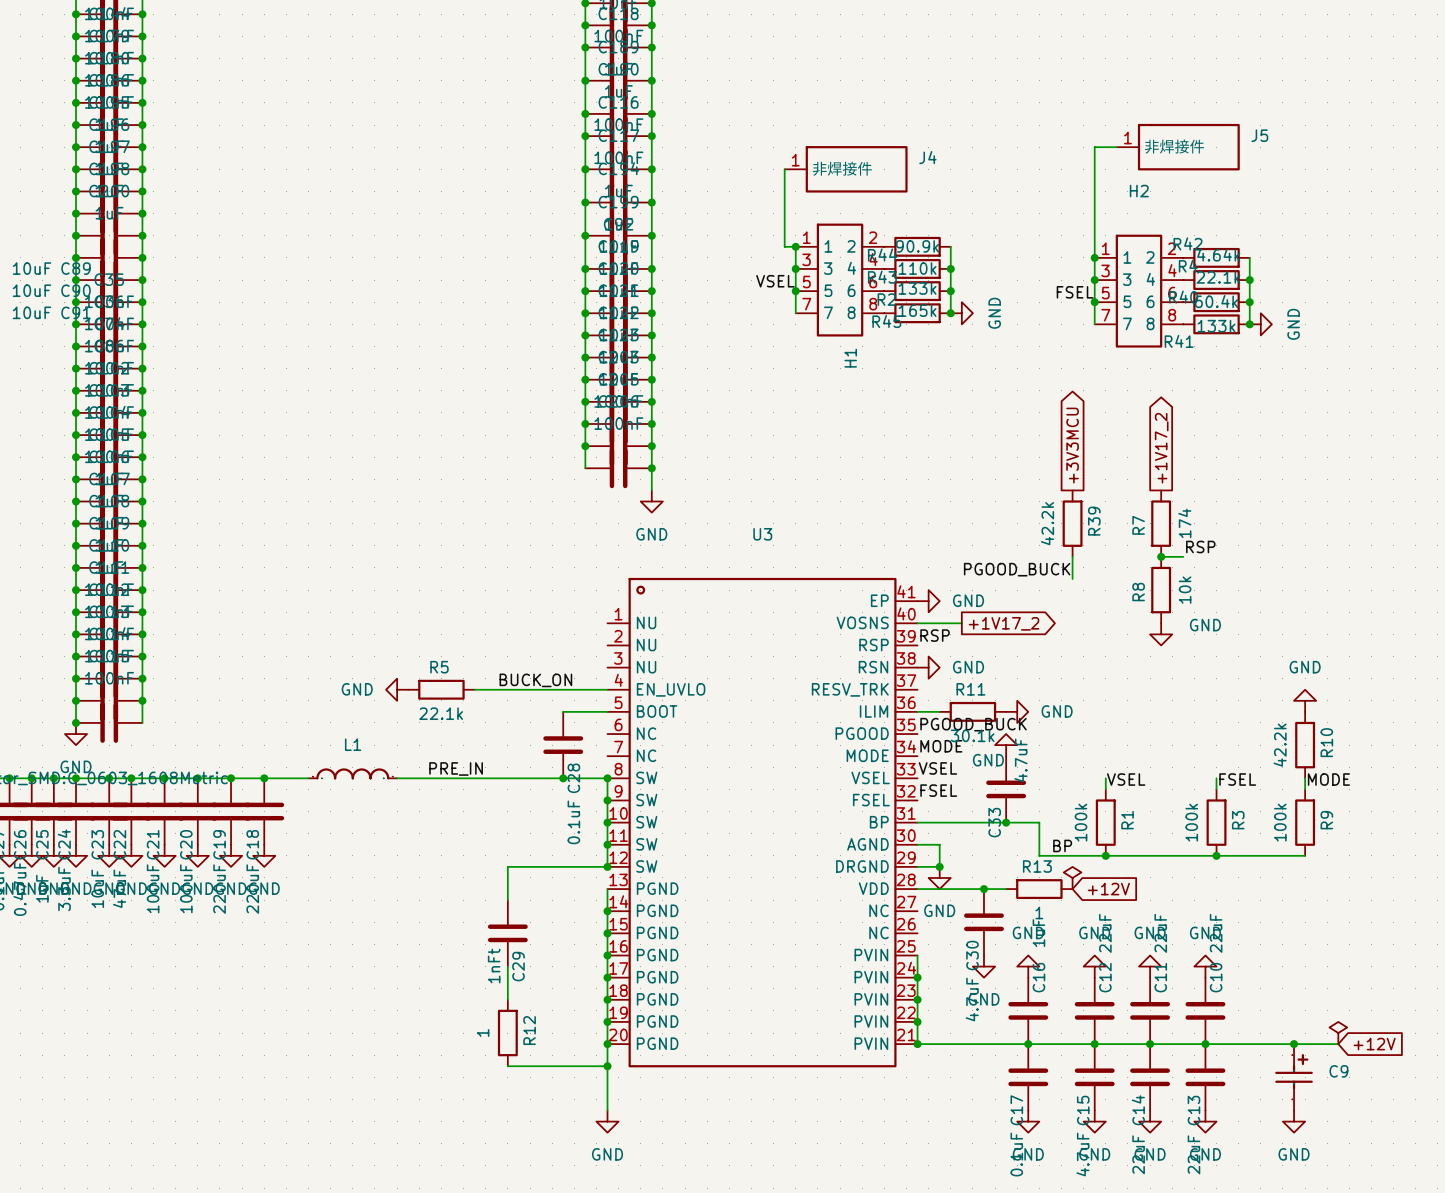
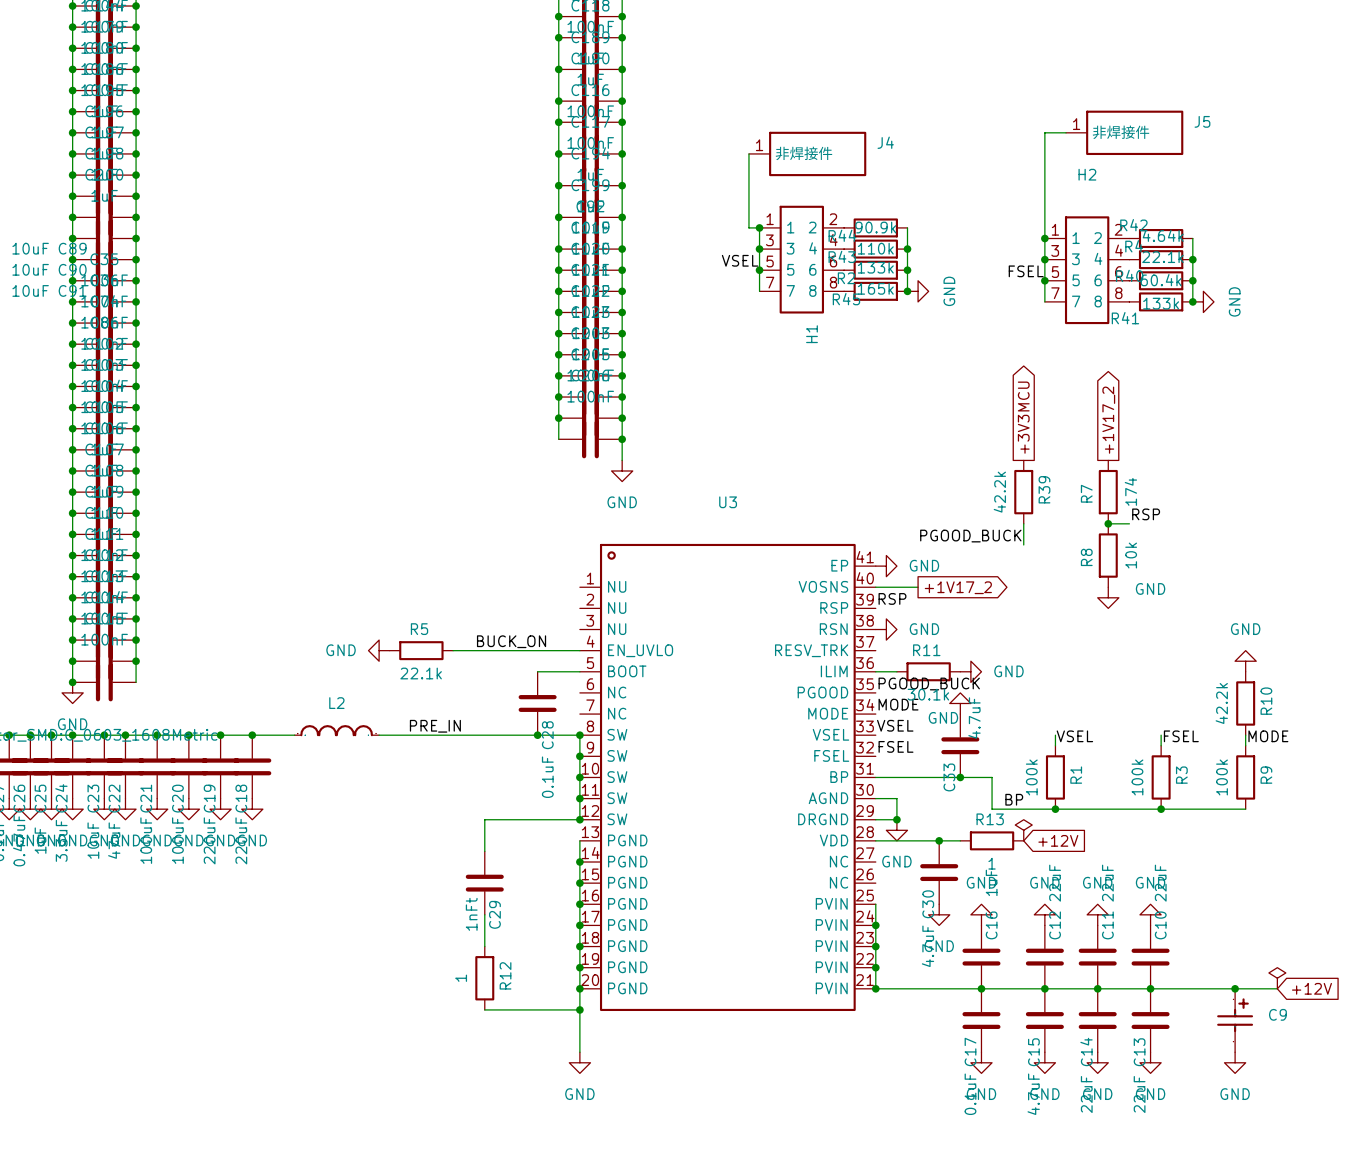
L1: (352, 773) -> none
L2: none -> (336, 730)

